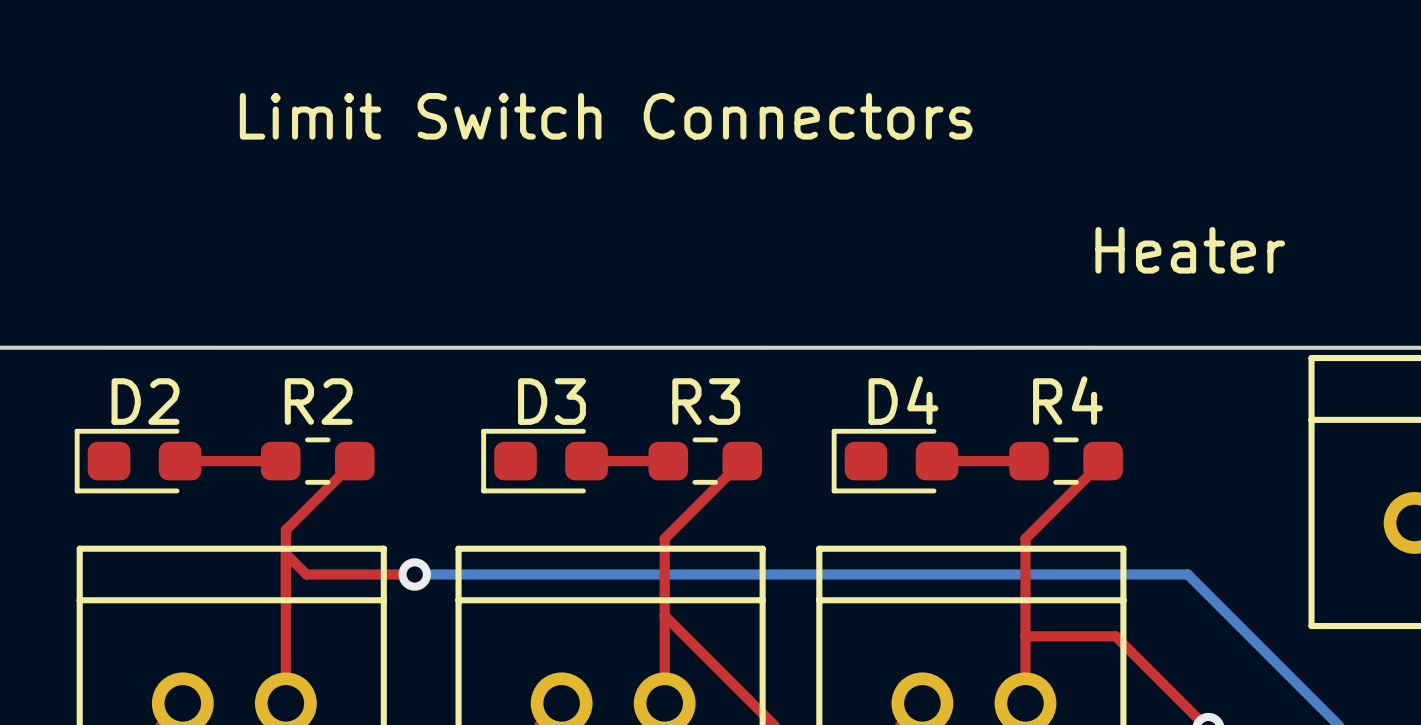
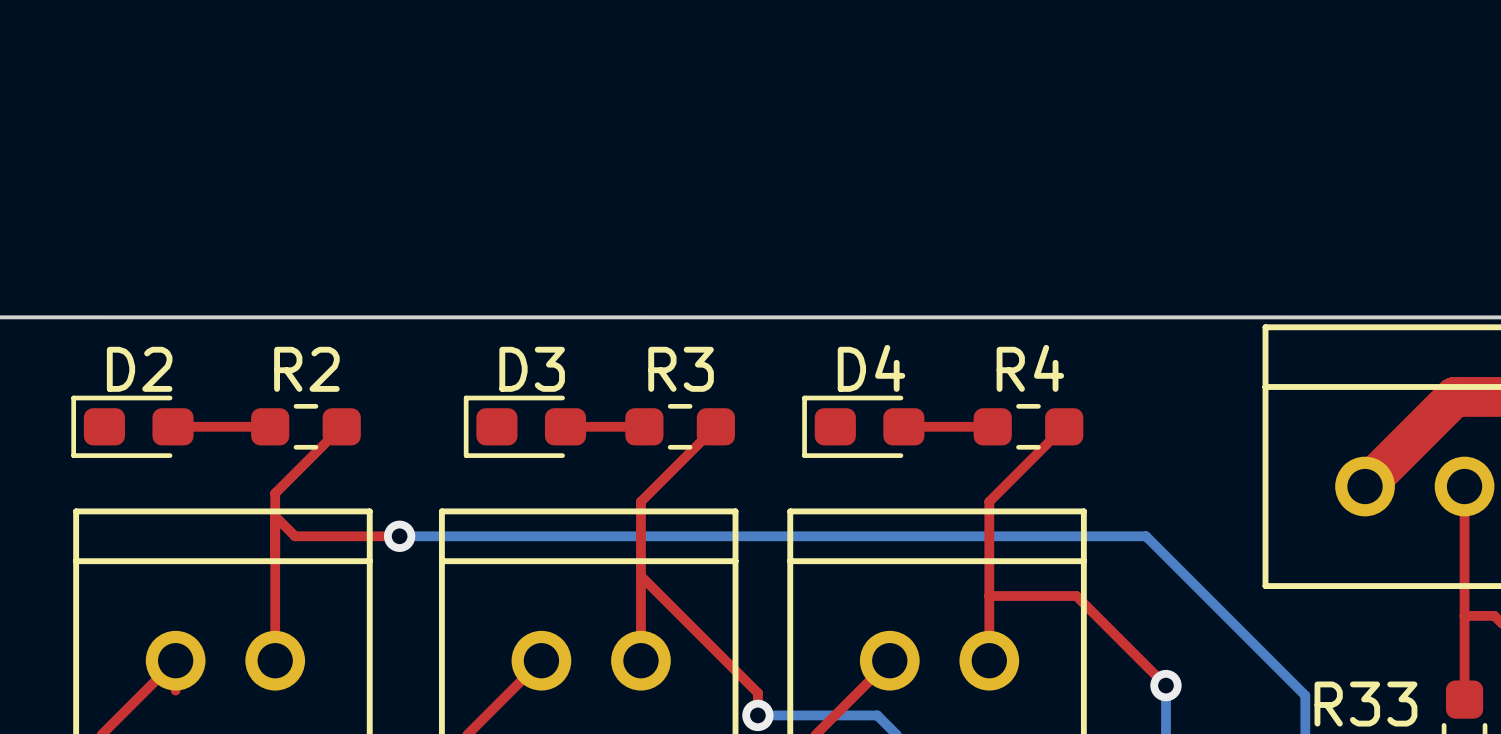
text: Limit Switch Connectors (606, 116) -> none
text: Heater (1190, 250) -> none

